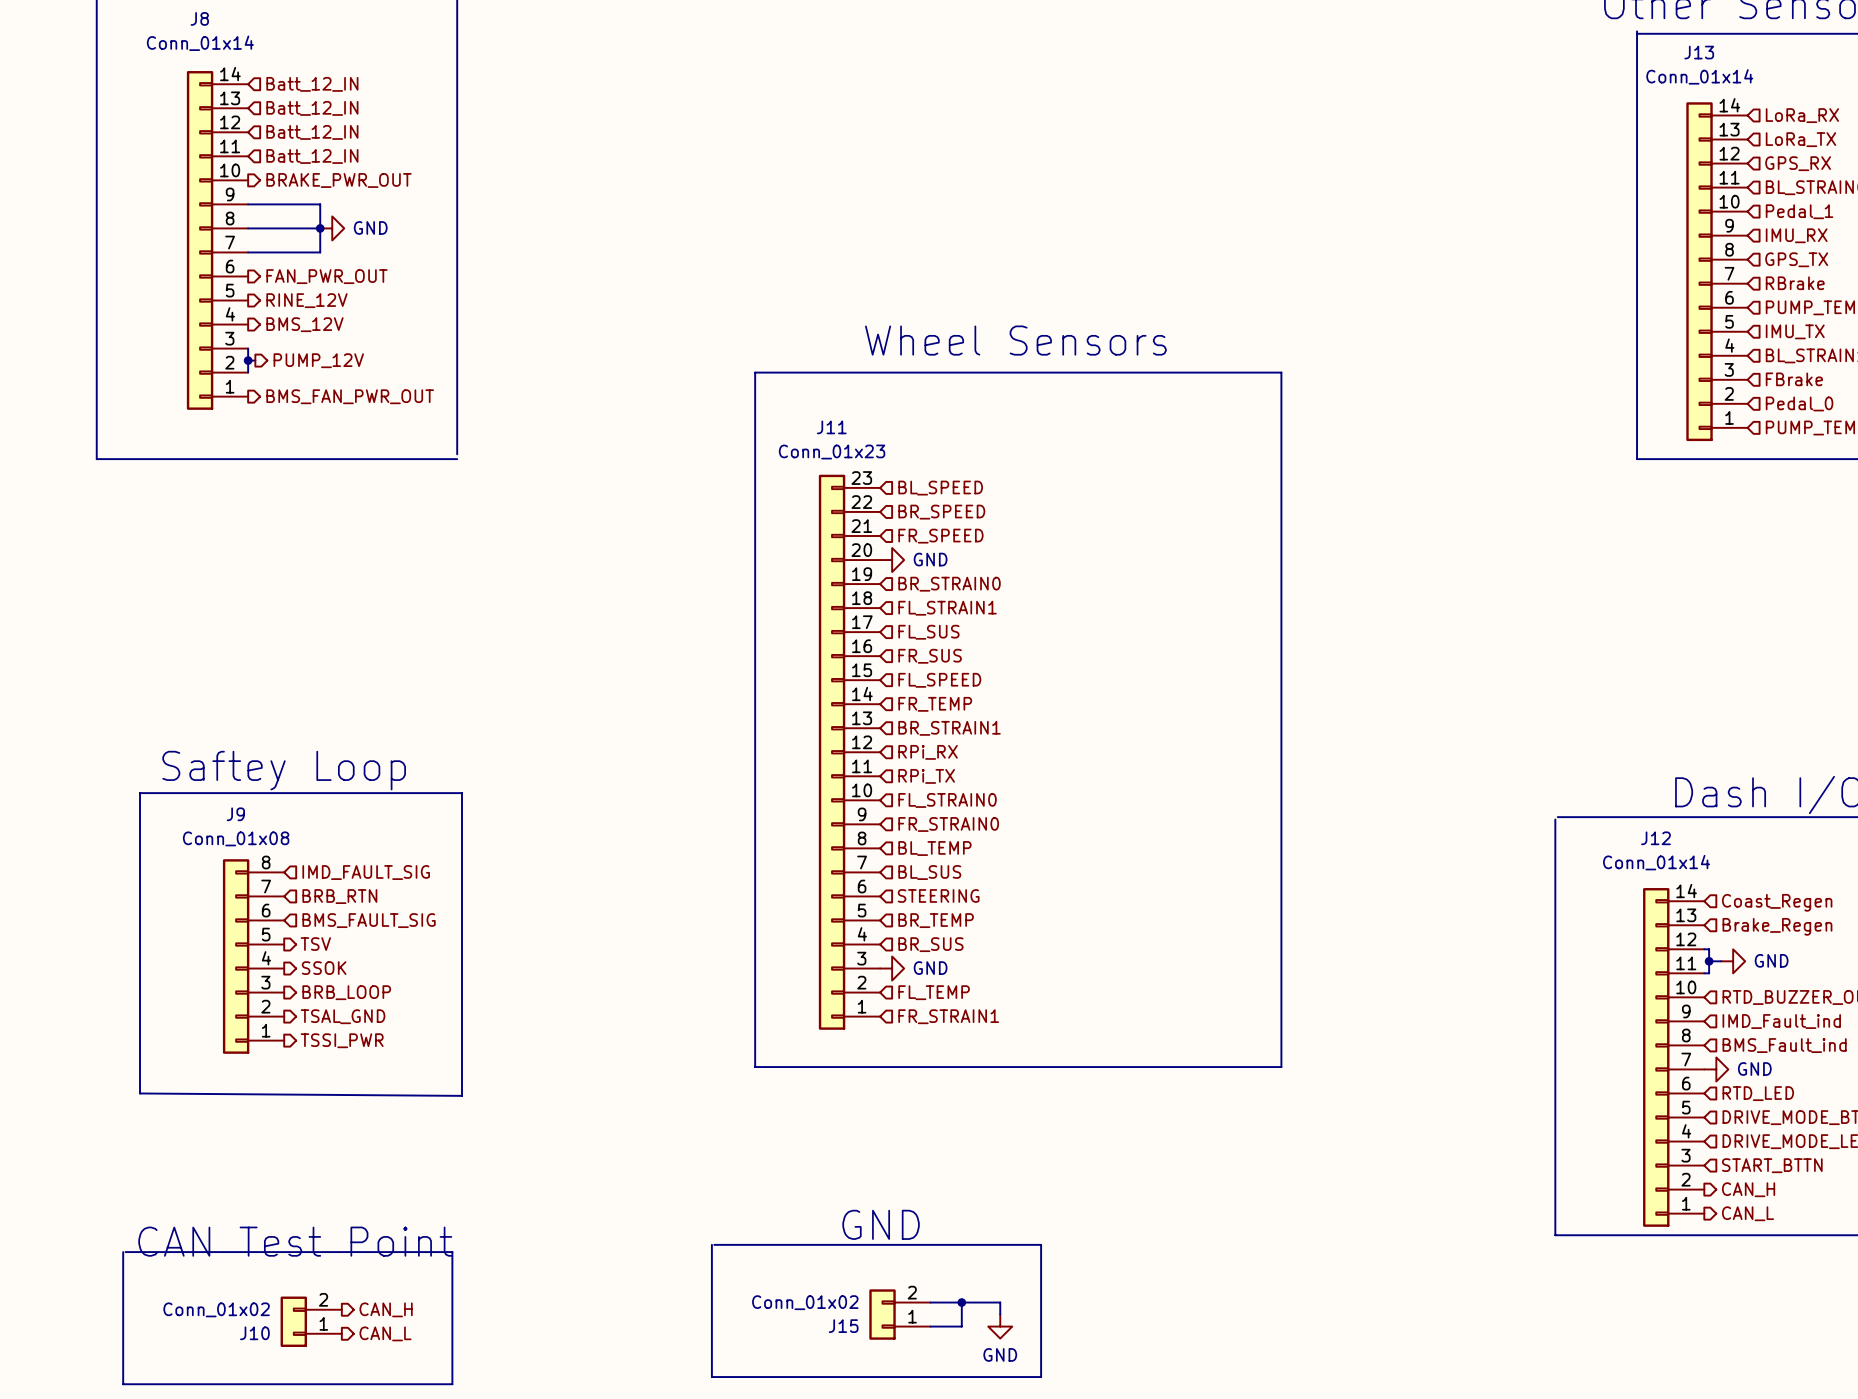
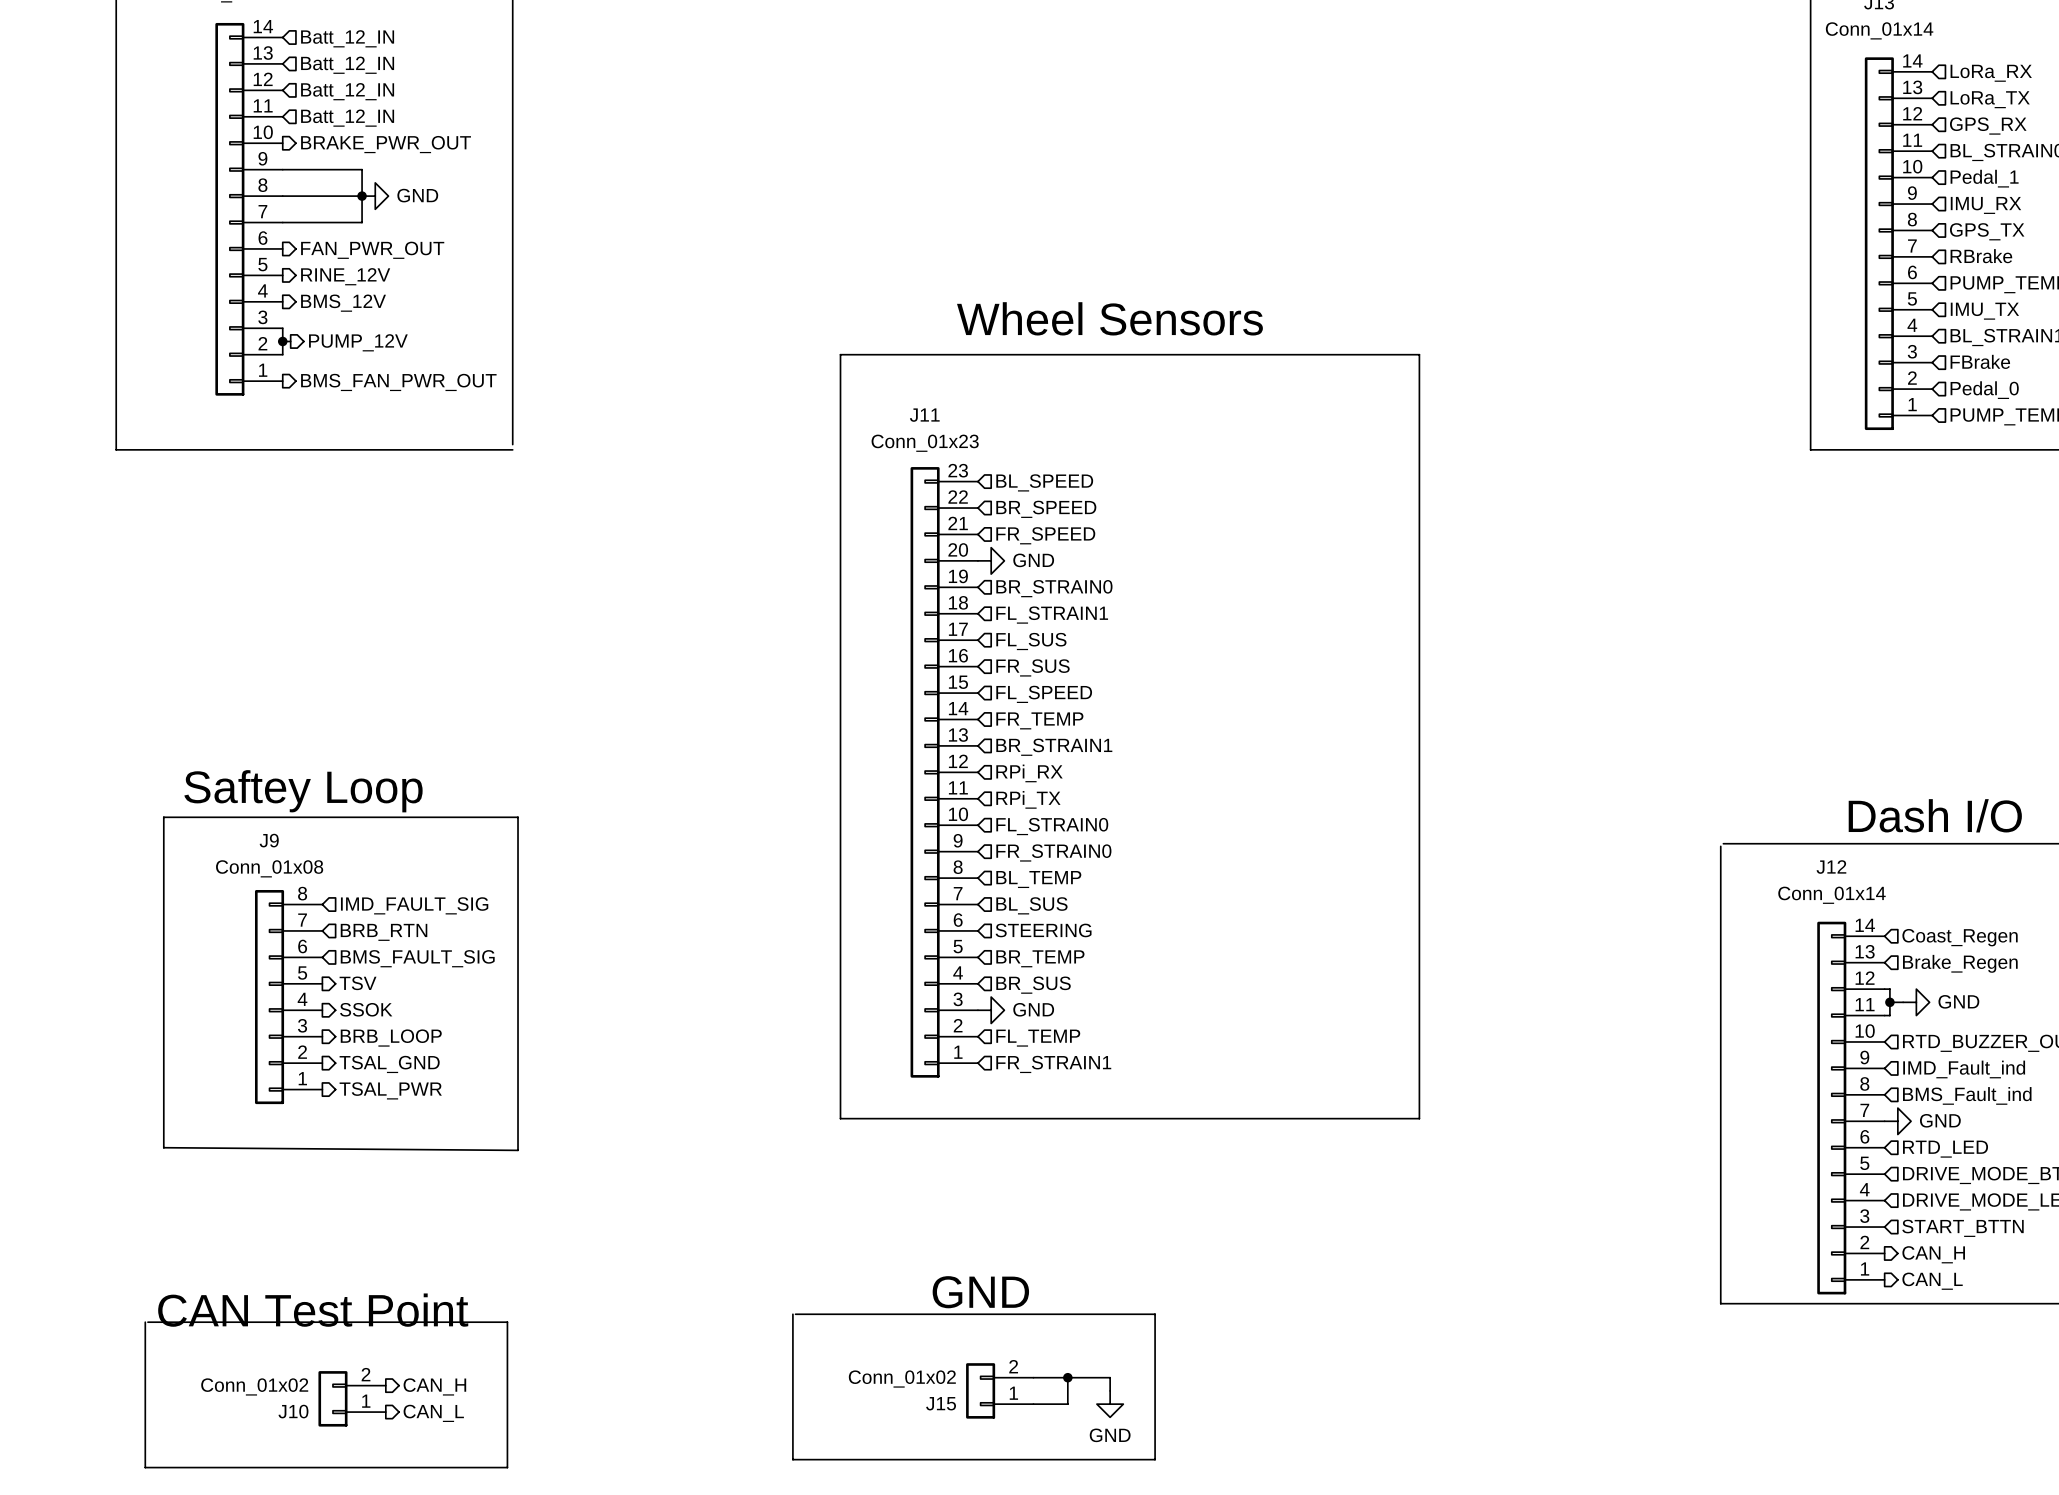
hierarchical label: TSSI_PWR (342, 1040) -> TSAL_PWR (390, 1090)

